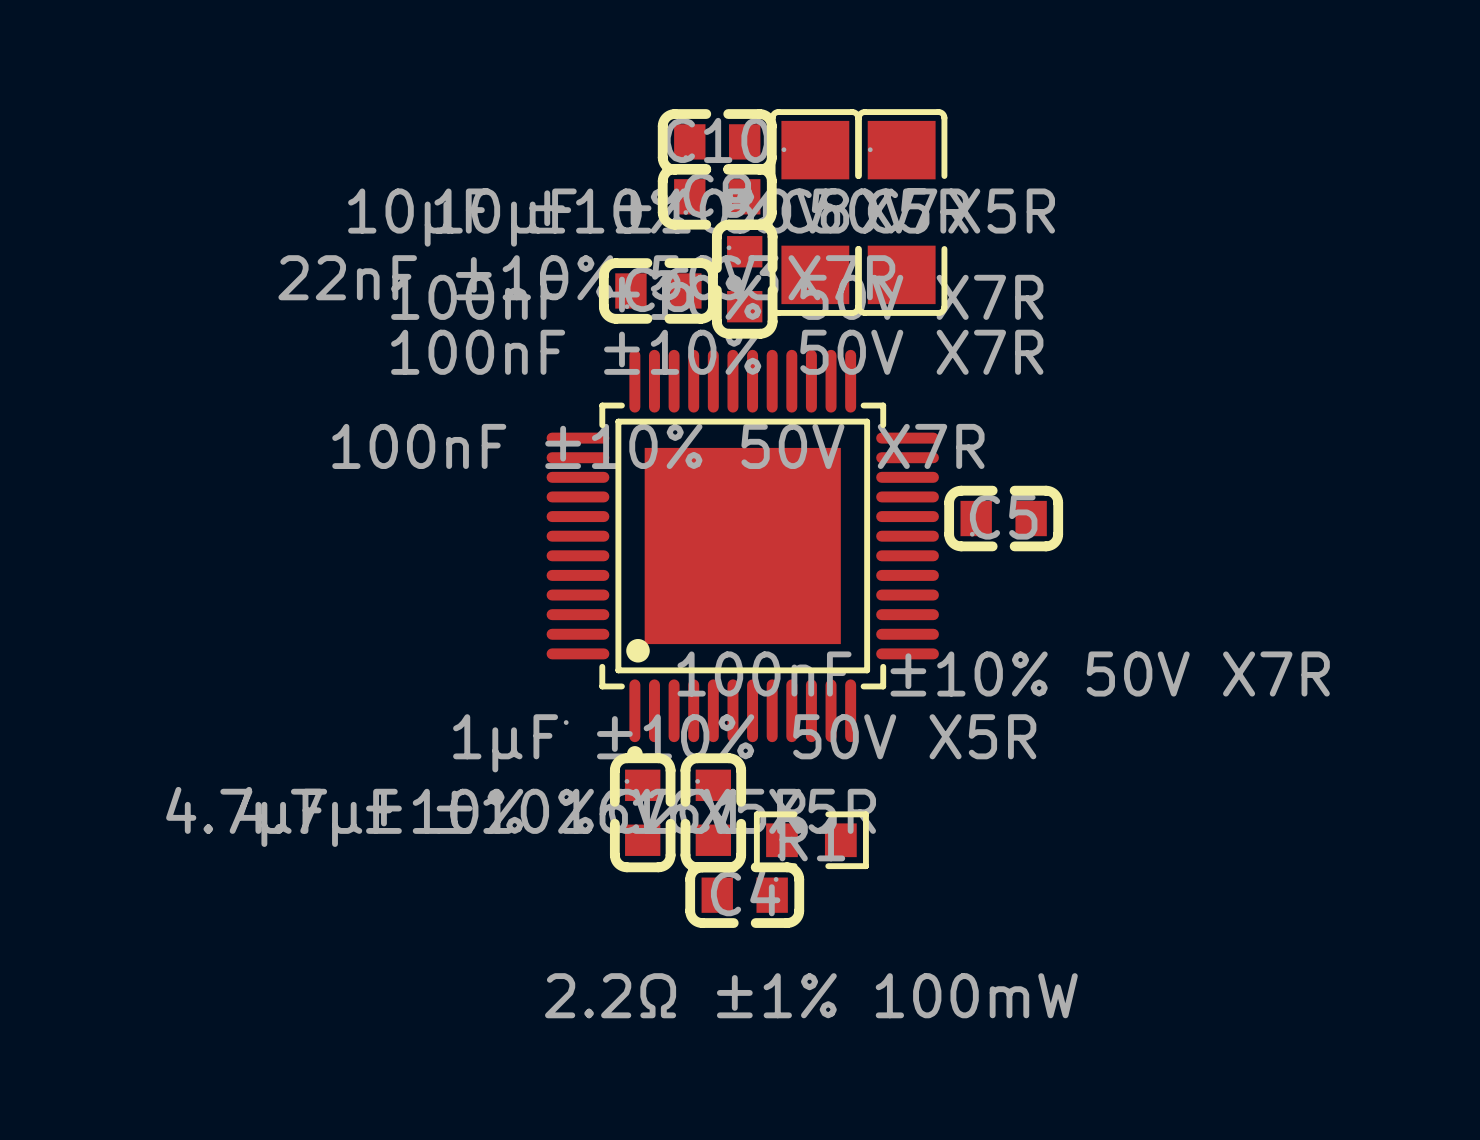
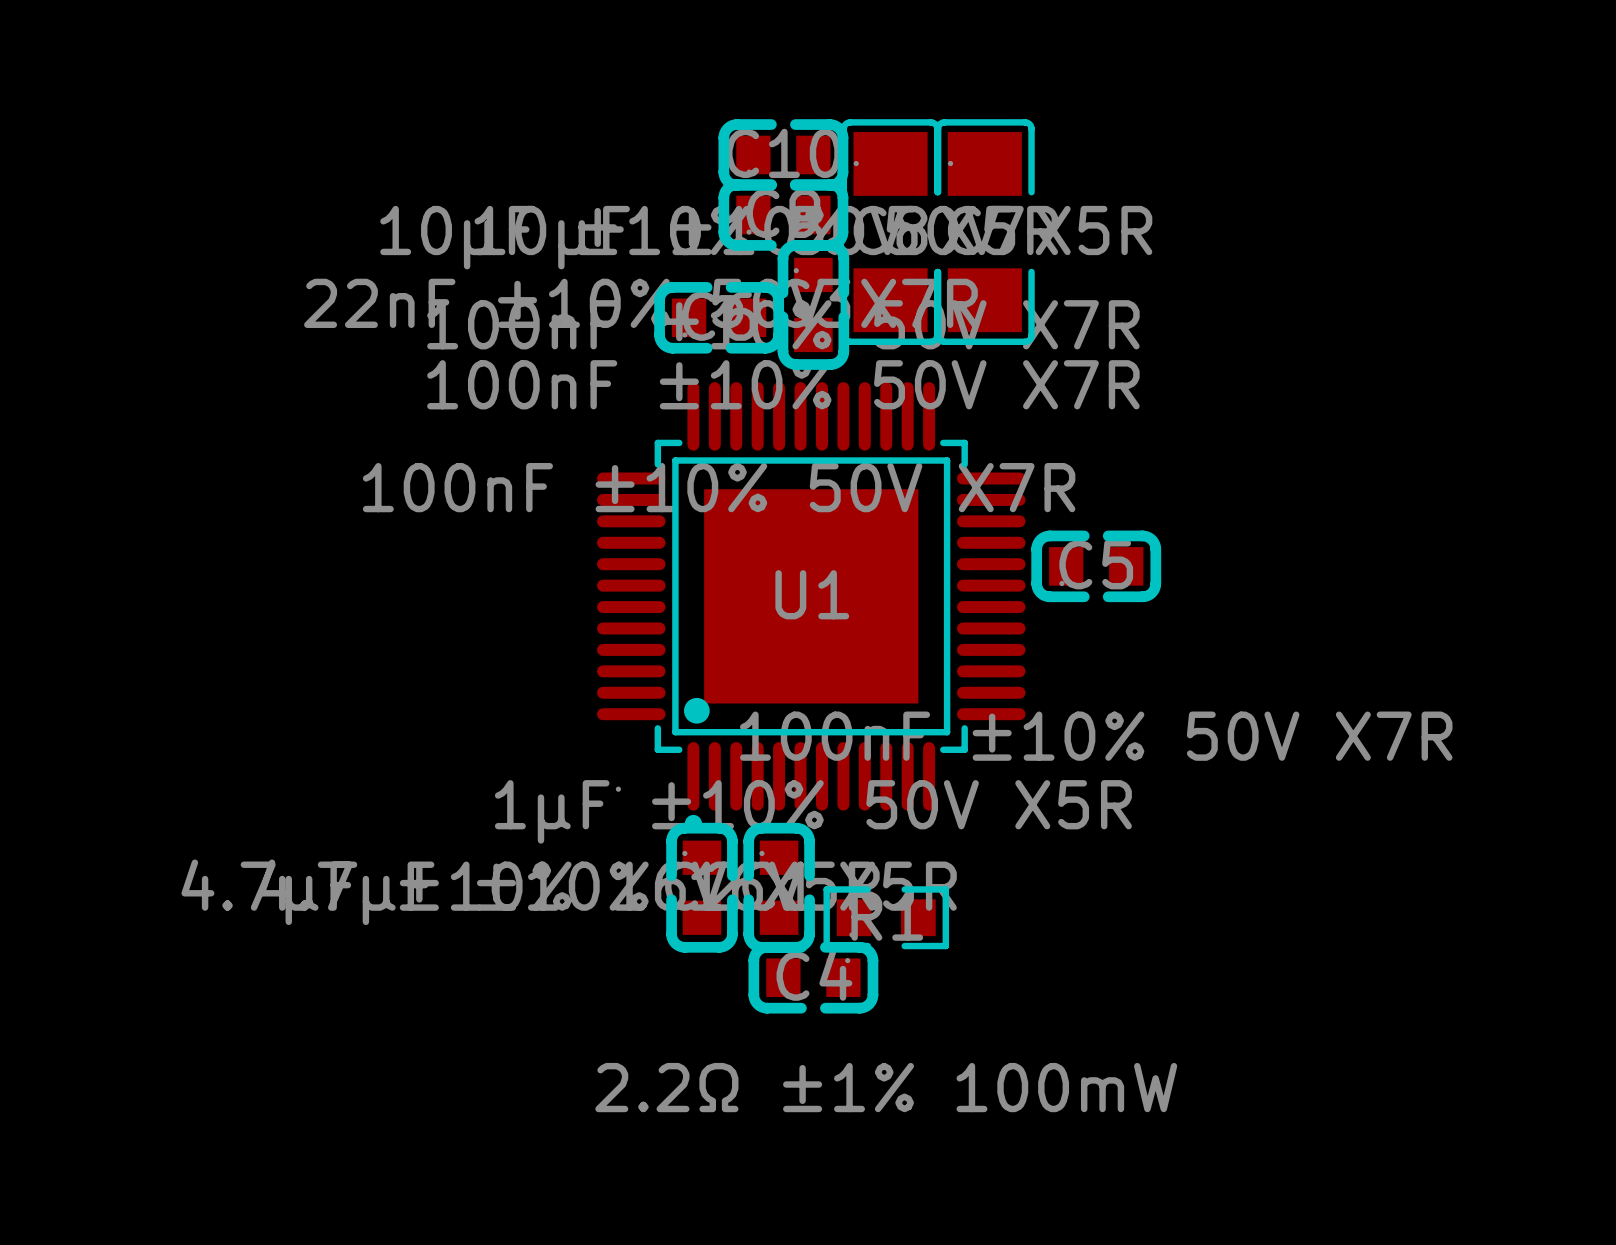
U1 name: none -> U1 (812, 594)

